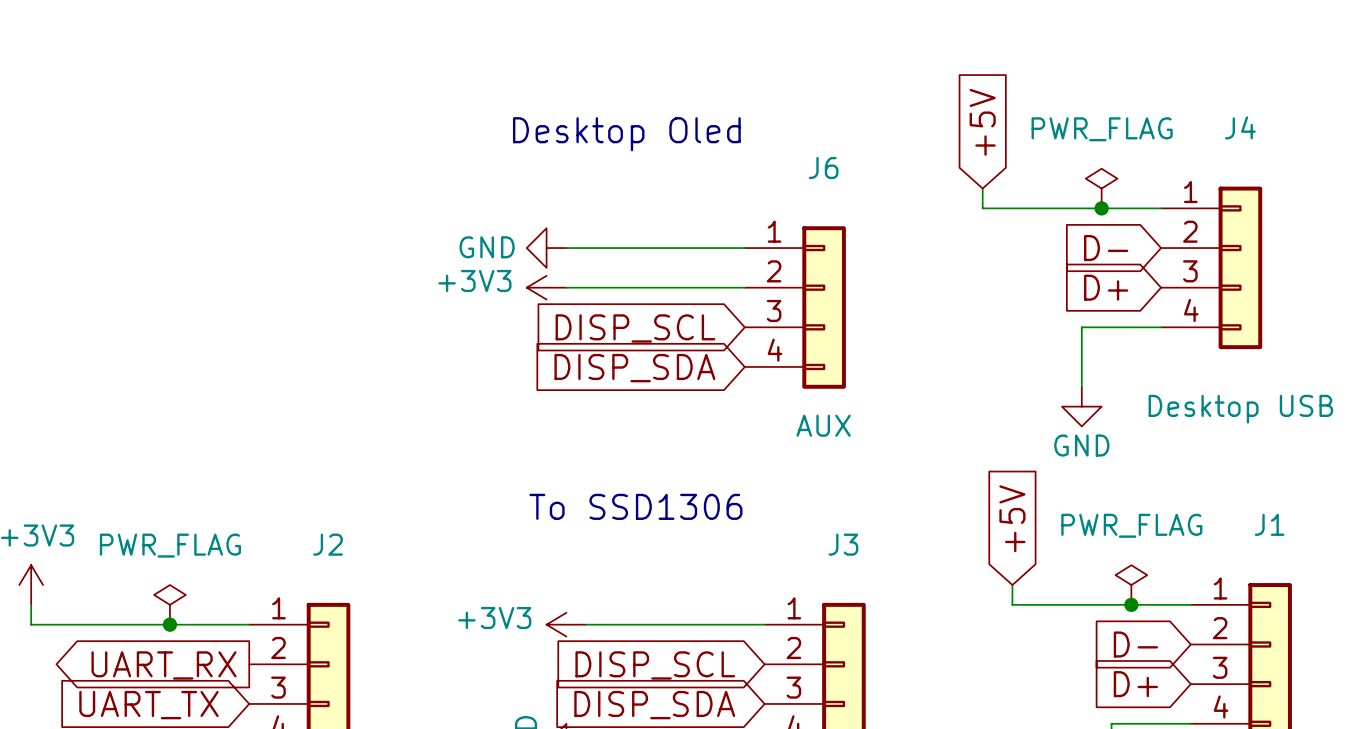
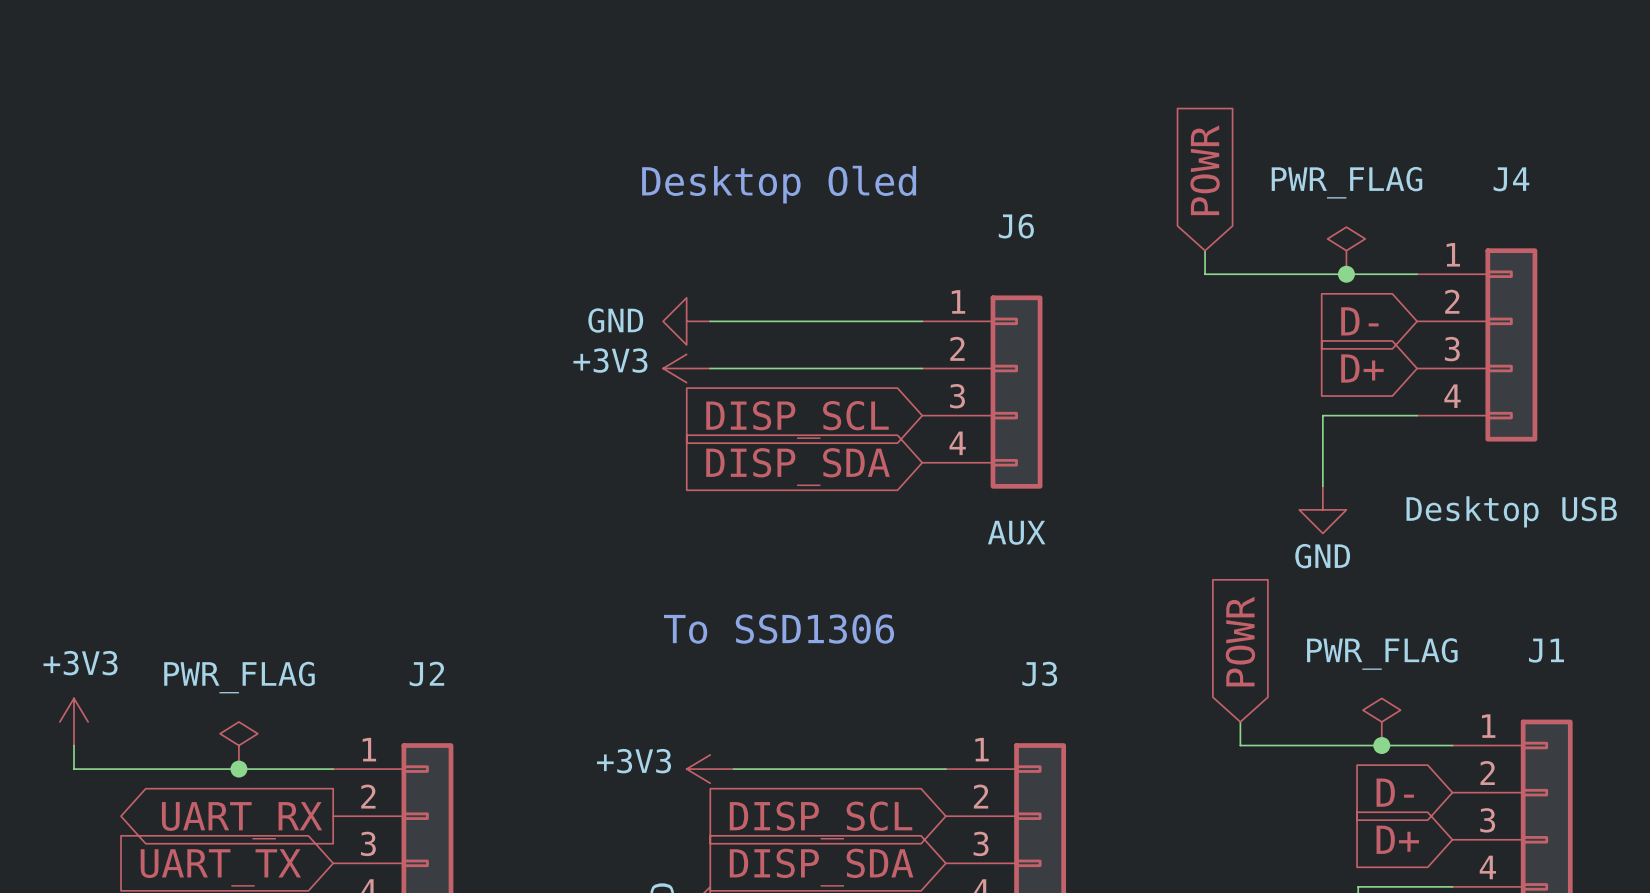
global label: +5V (982, 122) -> POWR (1205, 170)
global label: +5V (1012, 518) -> POWR (1240, 641)

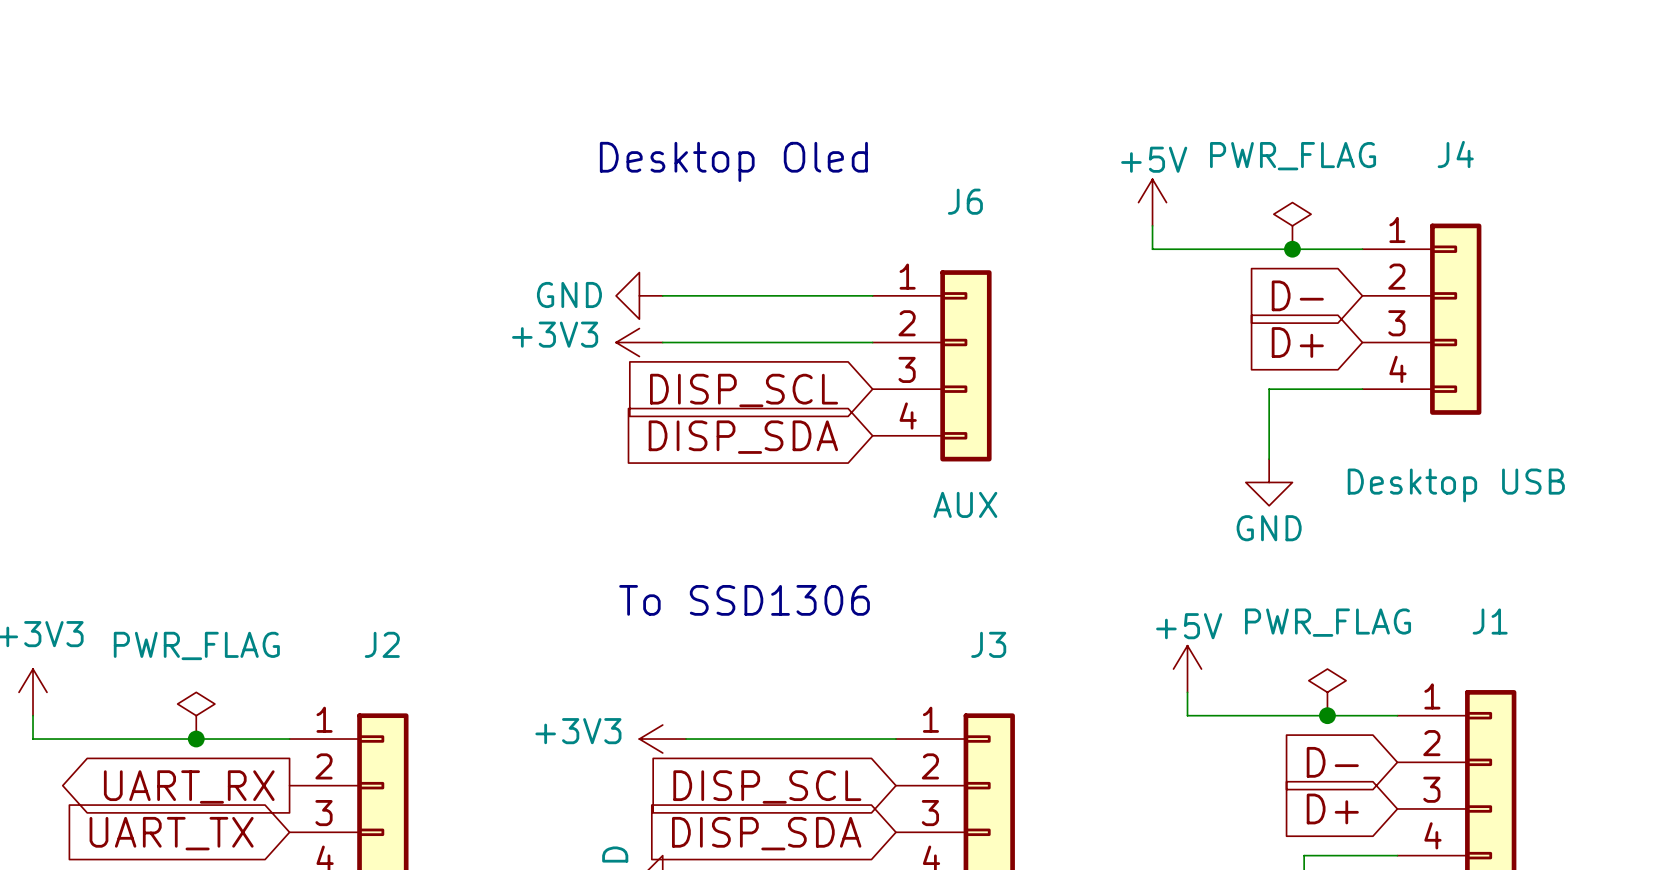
global label: POWR (1205, 170) -> none
power symbol: none -> +5V (1152, 202)
global label: POWR (1240, 641) -> none
power symbol: none -> +5V (1187, 669)

